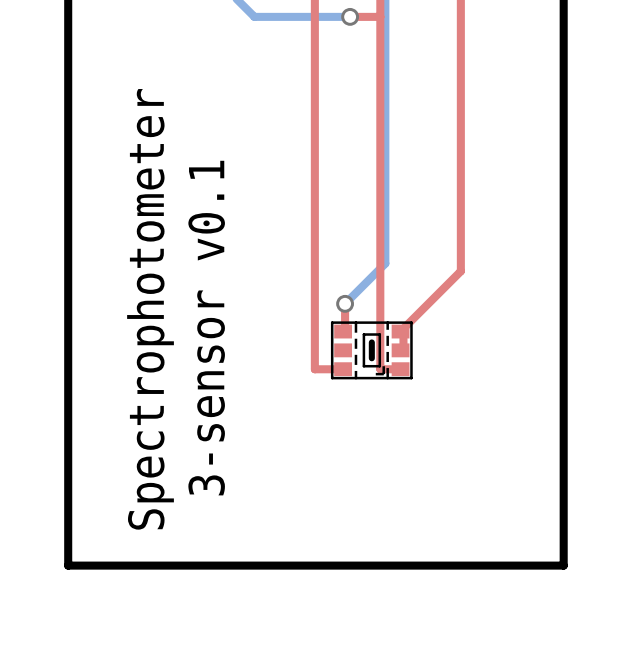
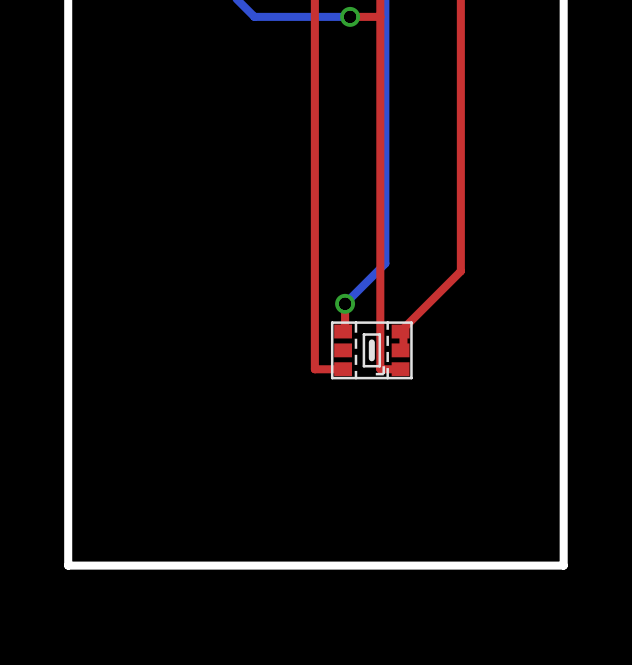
via: none -> (350, 16)
via: none -> (345, 303)
text: Spectrophotometer (150, 309) -> none
text: 3-sensor v0.1 (206, 328) -> none

